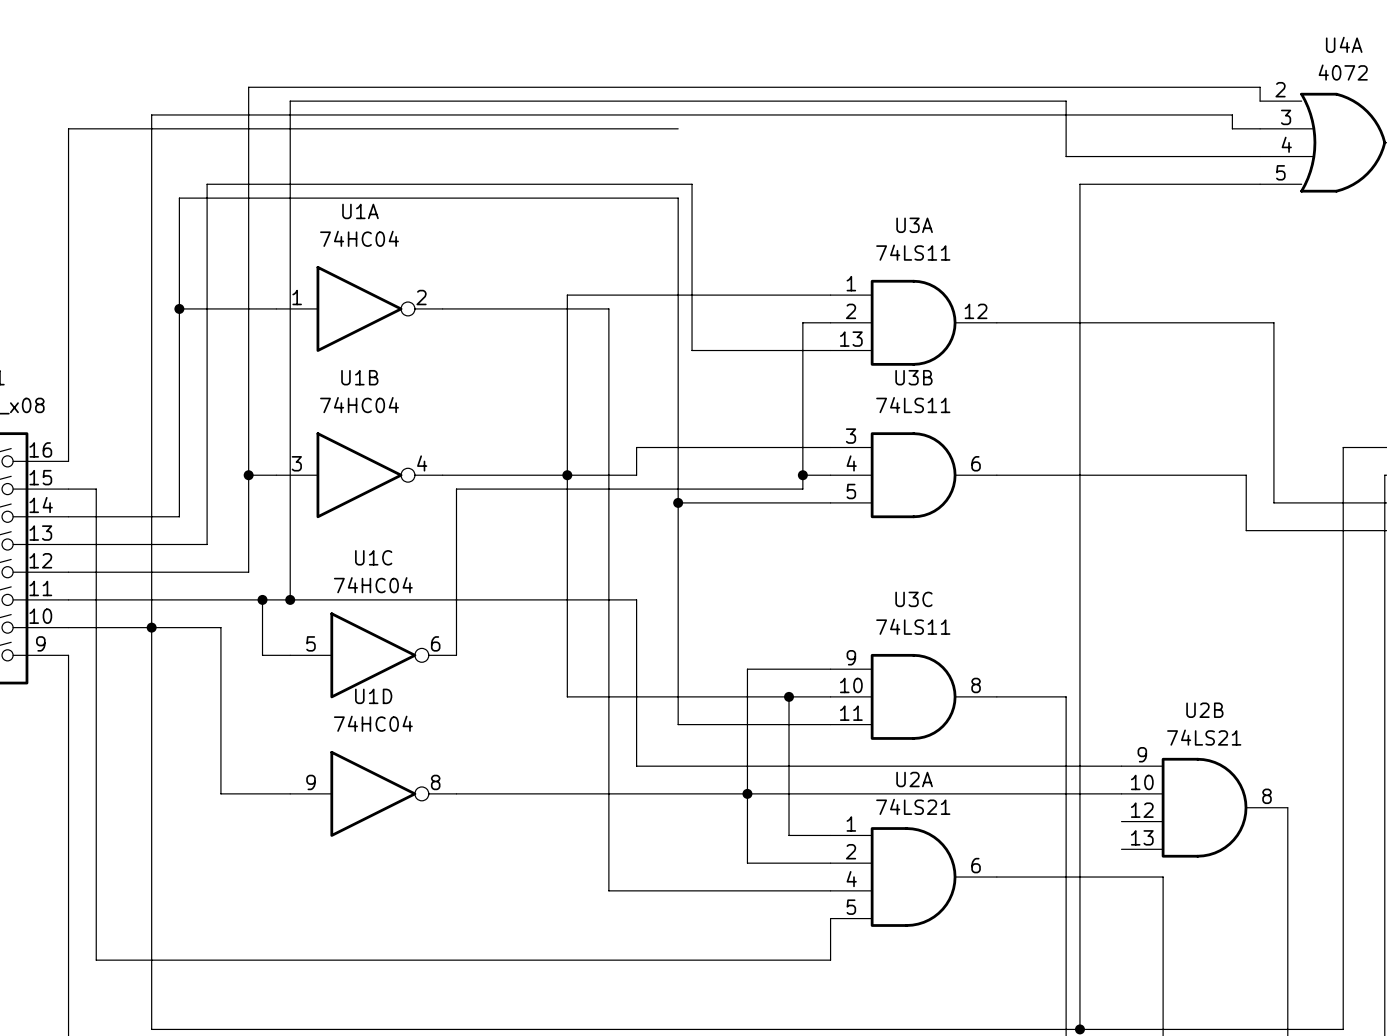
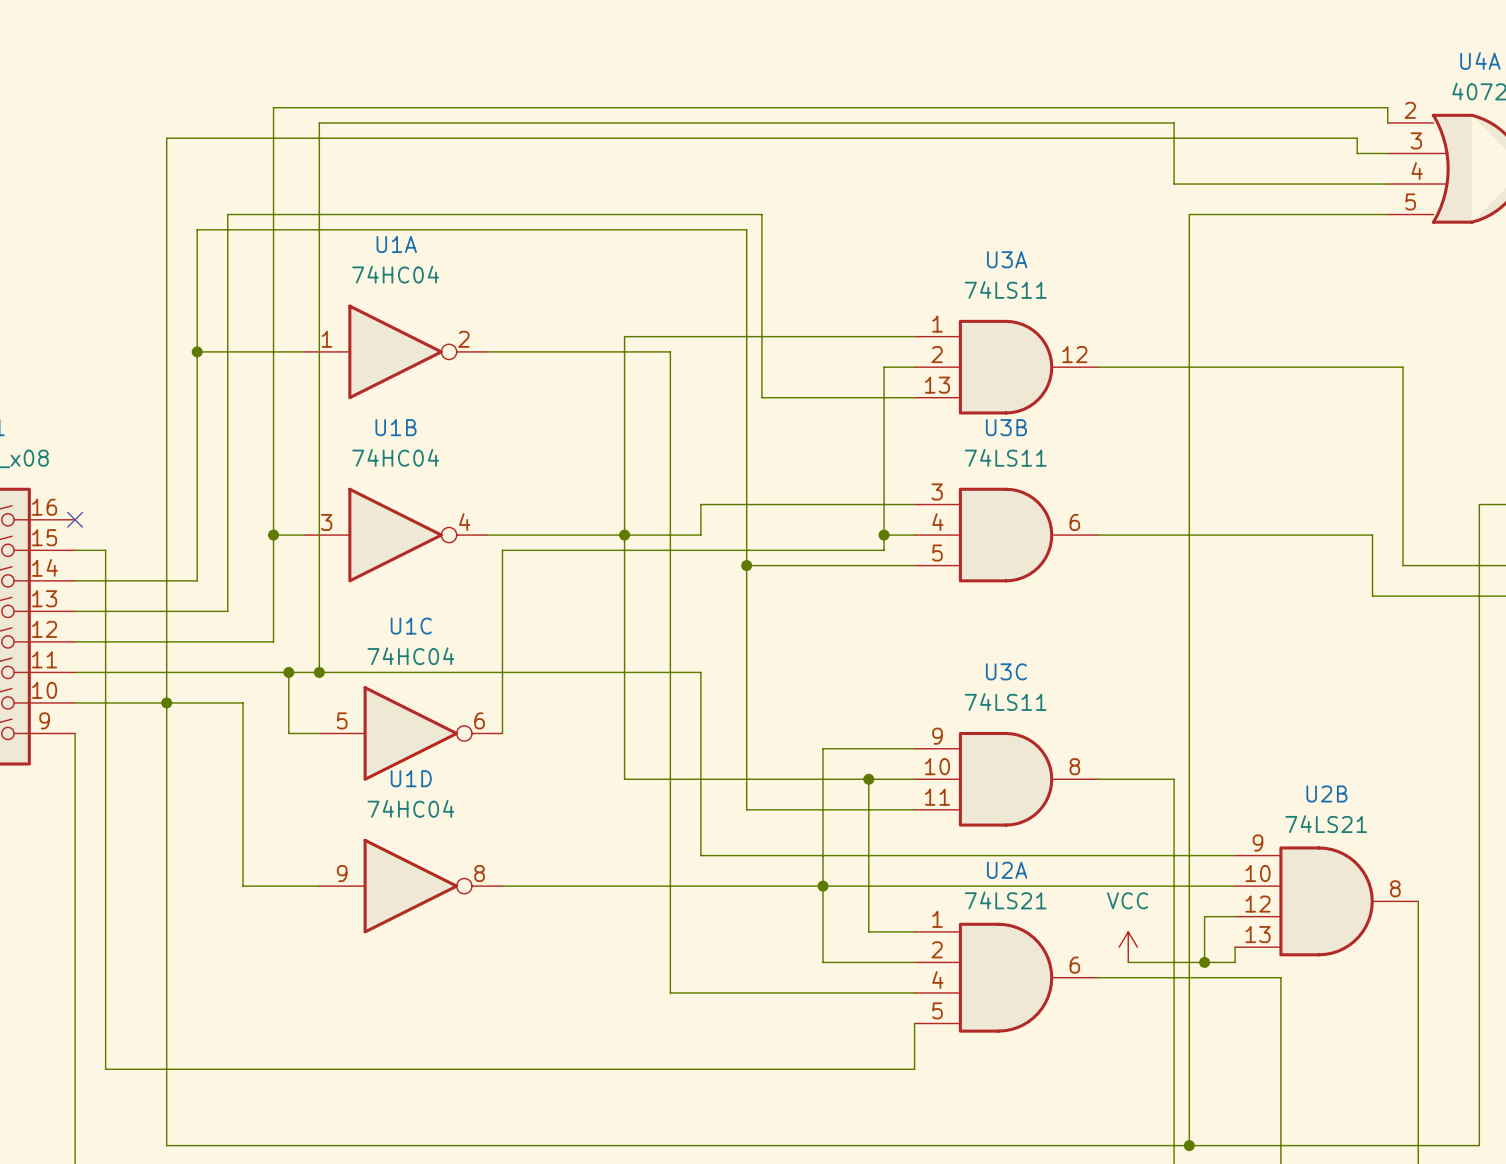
wire: (678, 128) (68, 128) (68, 461) -> none
no-connect mark: none -> (75, 519)
wire: none -> (1235, 916) (1204, 916) (1204, 962)
power symbol: none -> VCC (1128, 947)
wire: none -> (1235, 947) (1235, 962) (1128, 962)
junction: none -> (1204, 962)

